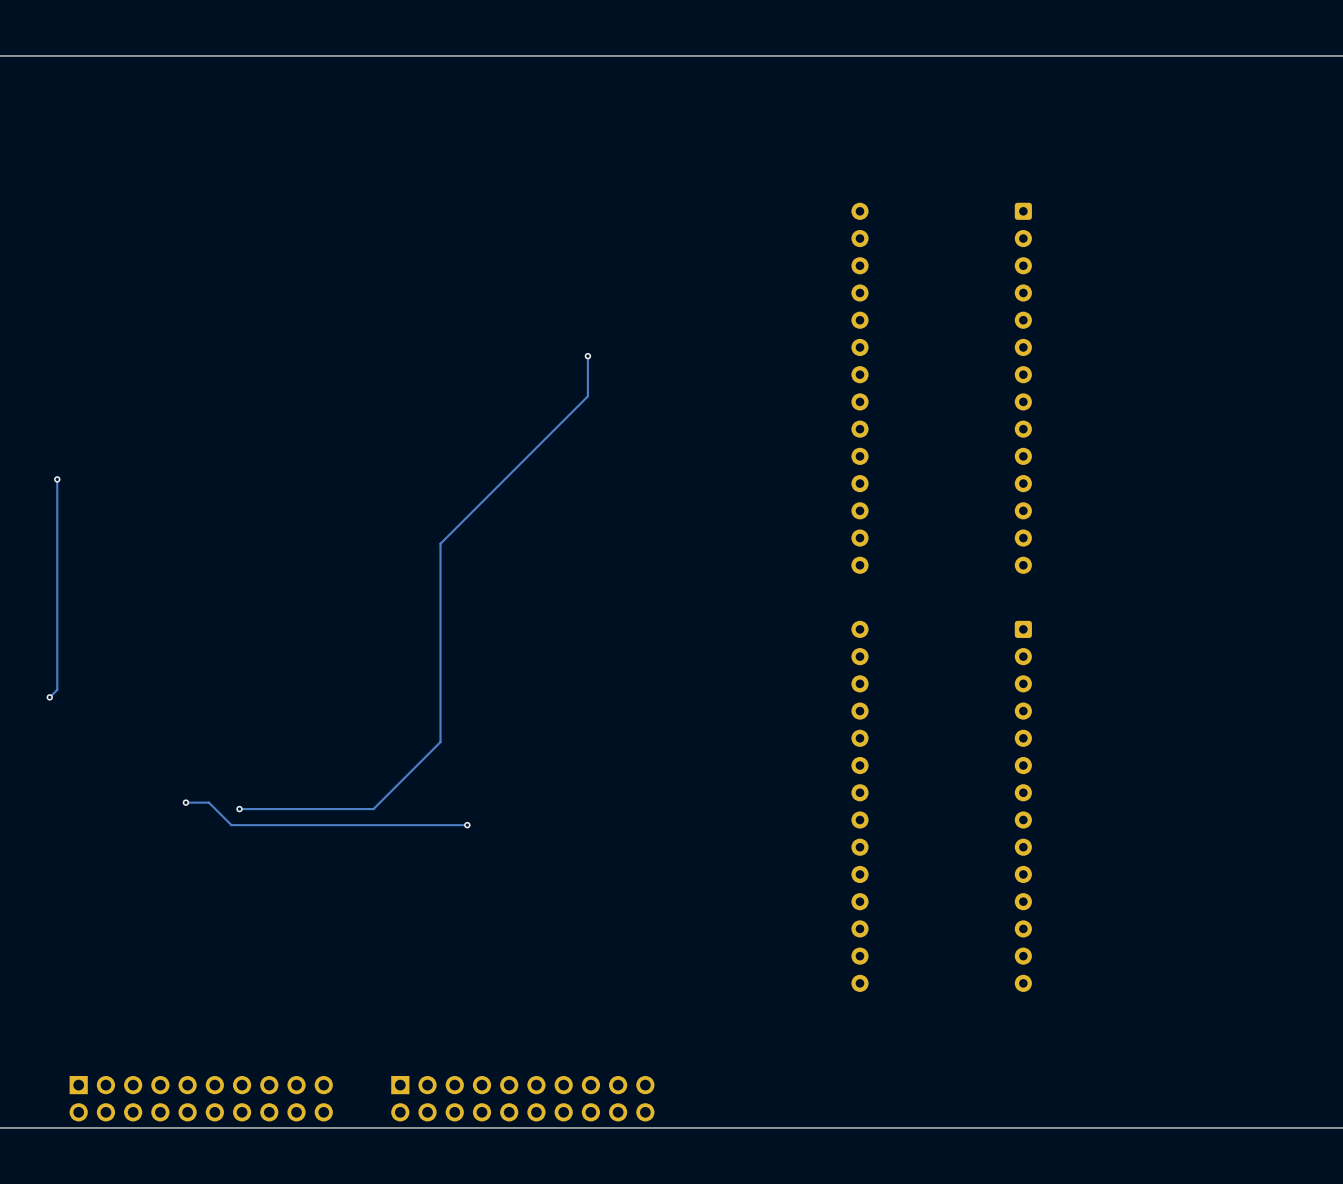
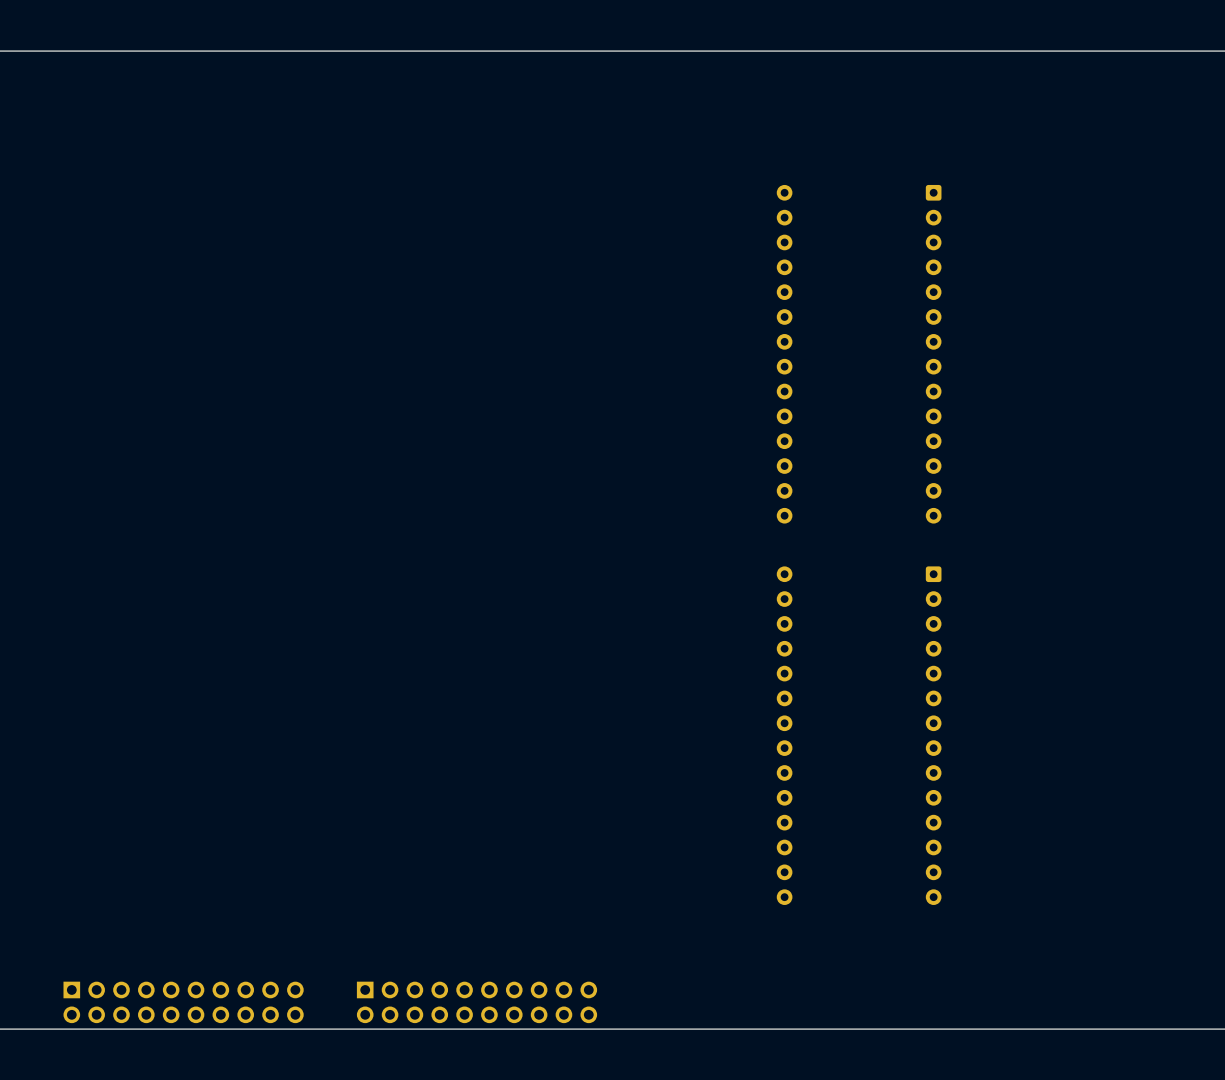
track: (587, 356) (587, 396) (440, 543) (440, 742) (373, 809) (239, 809) -> none
via: (587, 356) -> none
track: (57, 479) (57, 689) (49, 697) -> none
via: (57, 479) -> none
via: (49, 697) -> none
track: (185, 802) (208, 802) (231, 825) (467, 825) -> none
via: (185, 802) -> none
via: (239, 809) -> none
via: (467, 825) -> none

